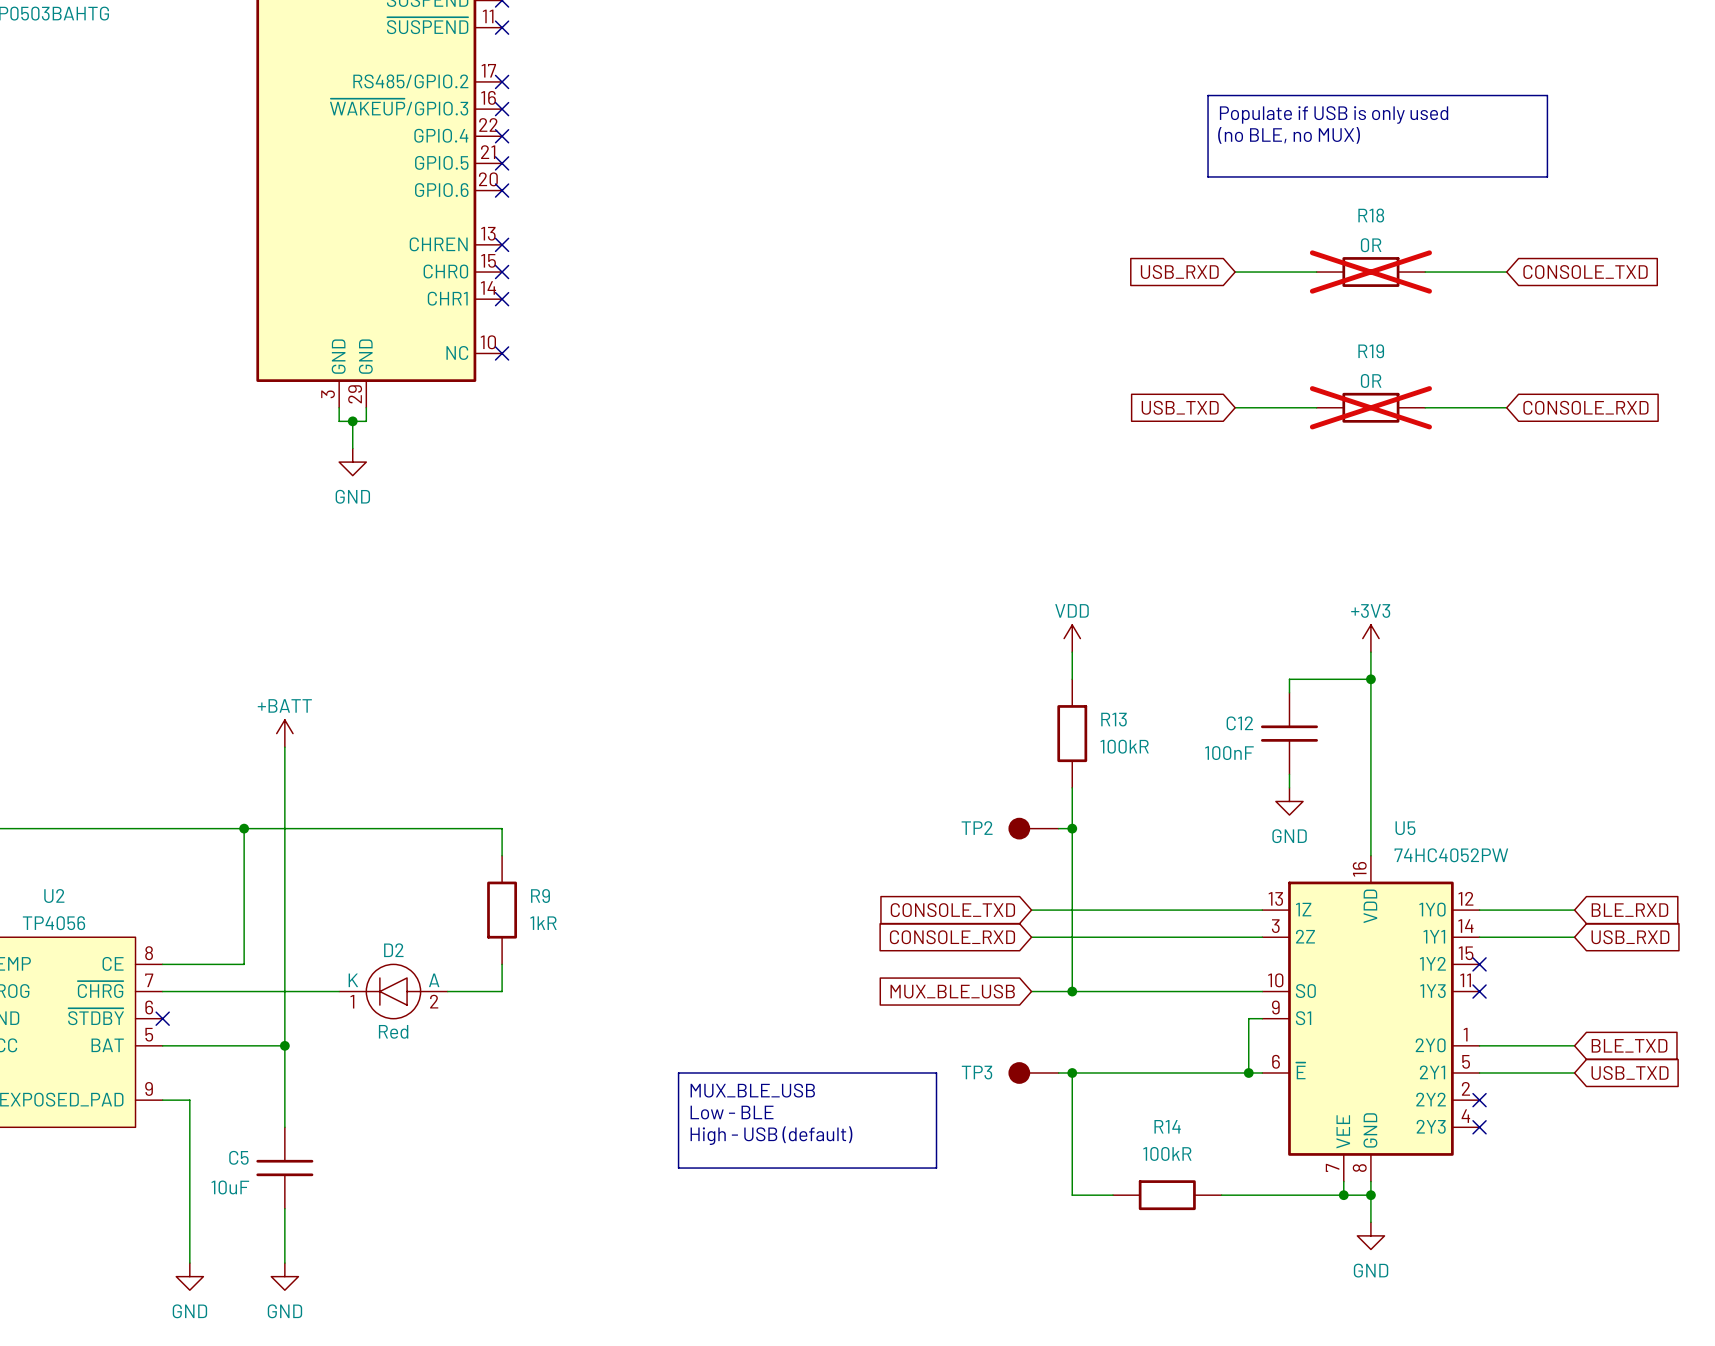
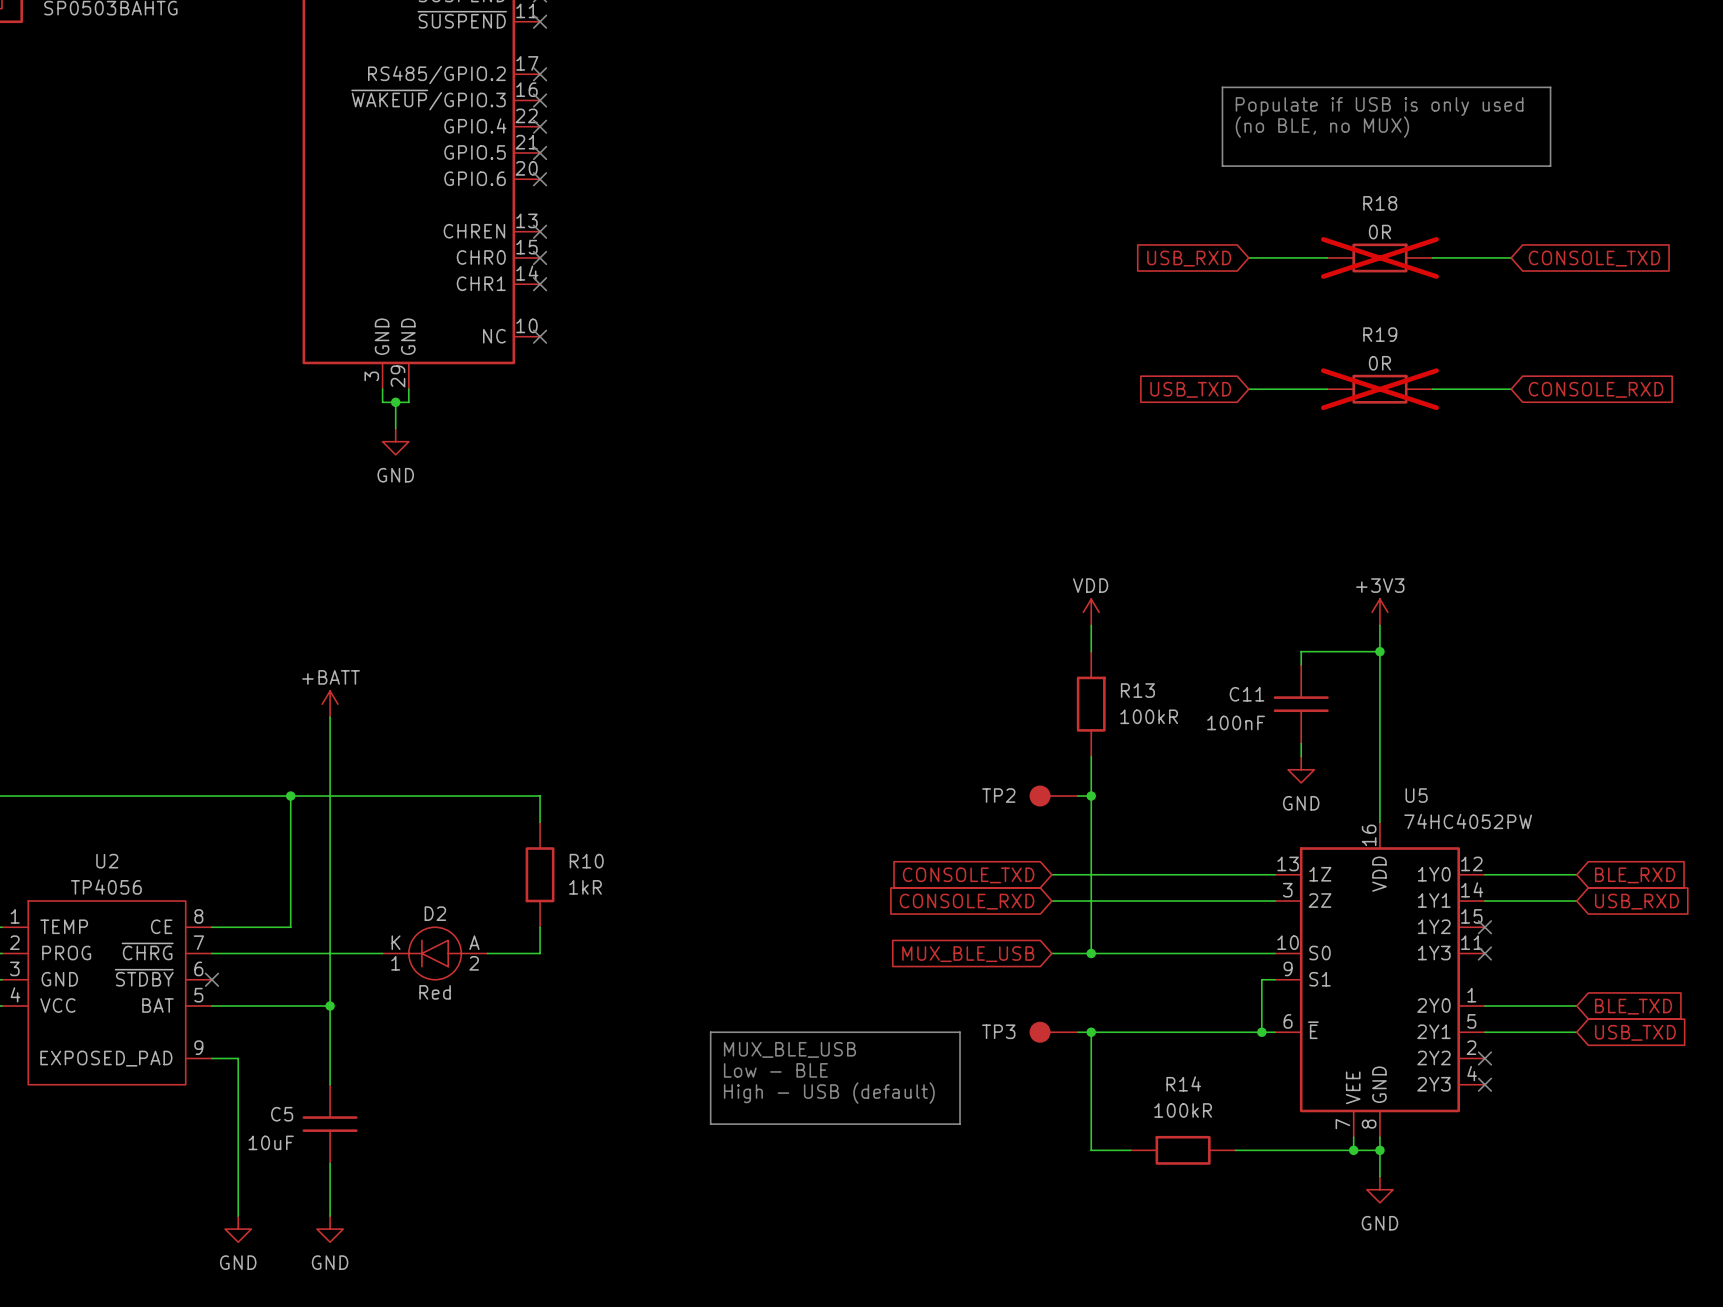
C12 name: C12 (1239, 723) -> C11 (1246, 694)
R9 name: R9 (540, 896) -> R10 (586, 861)

